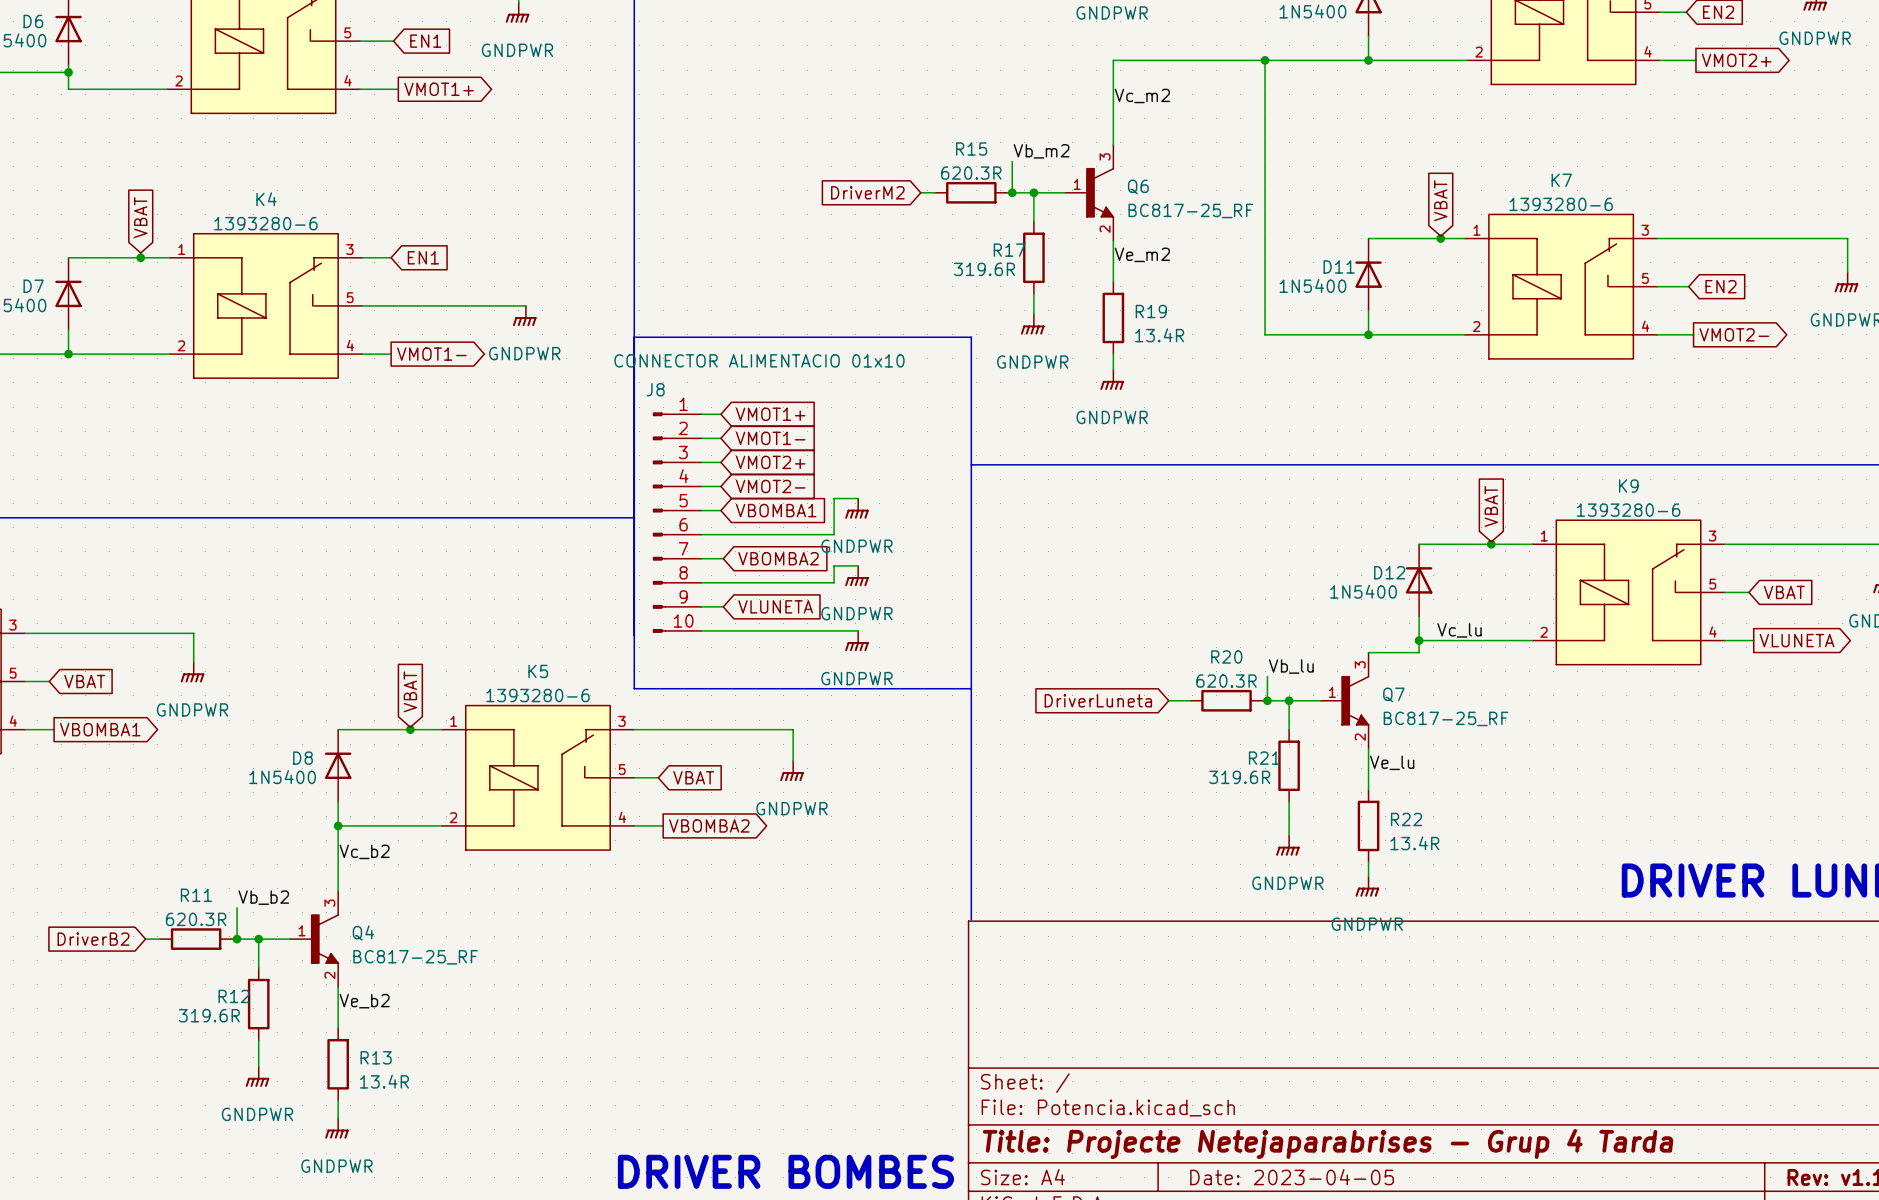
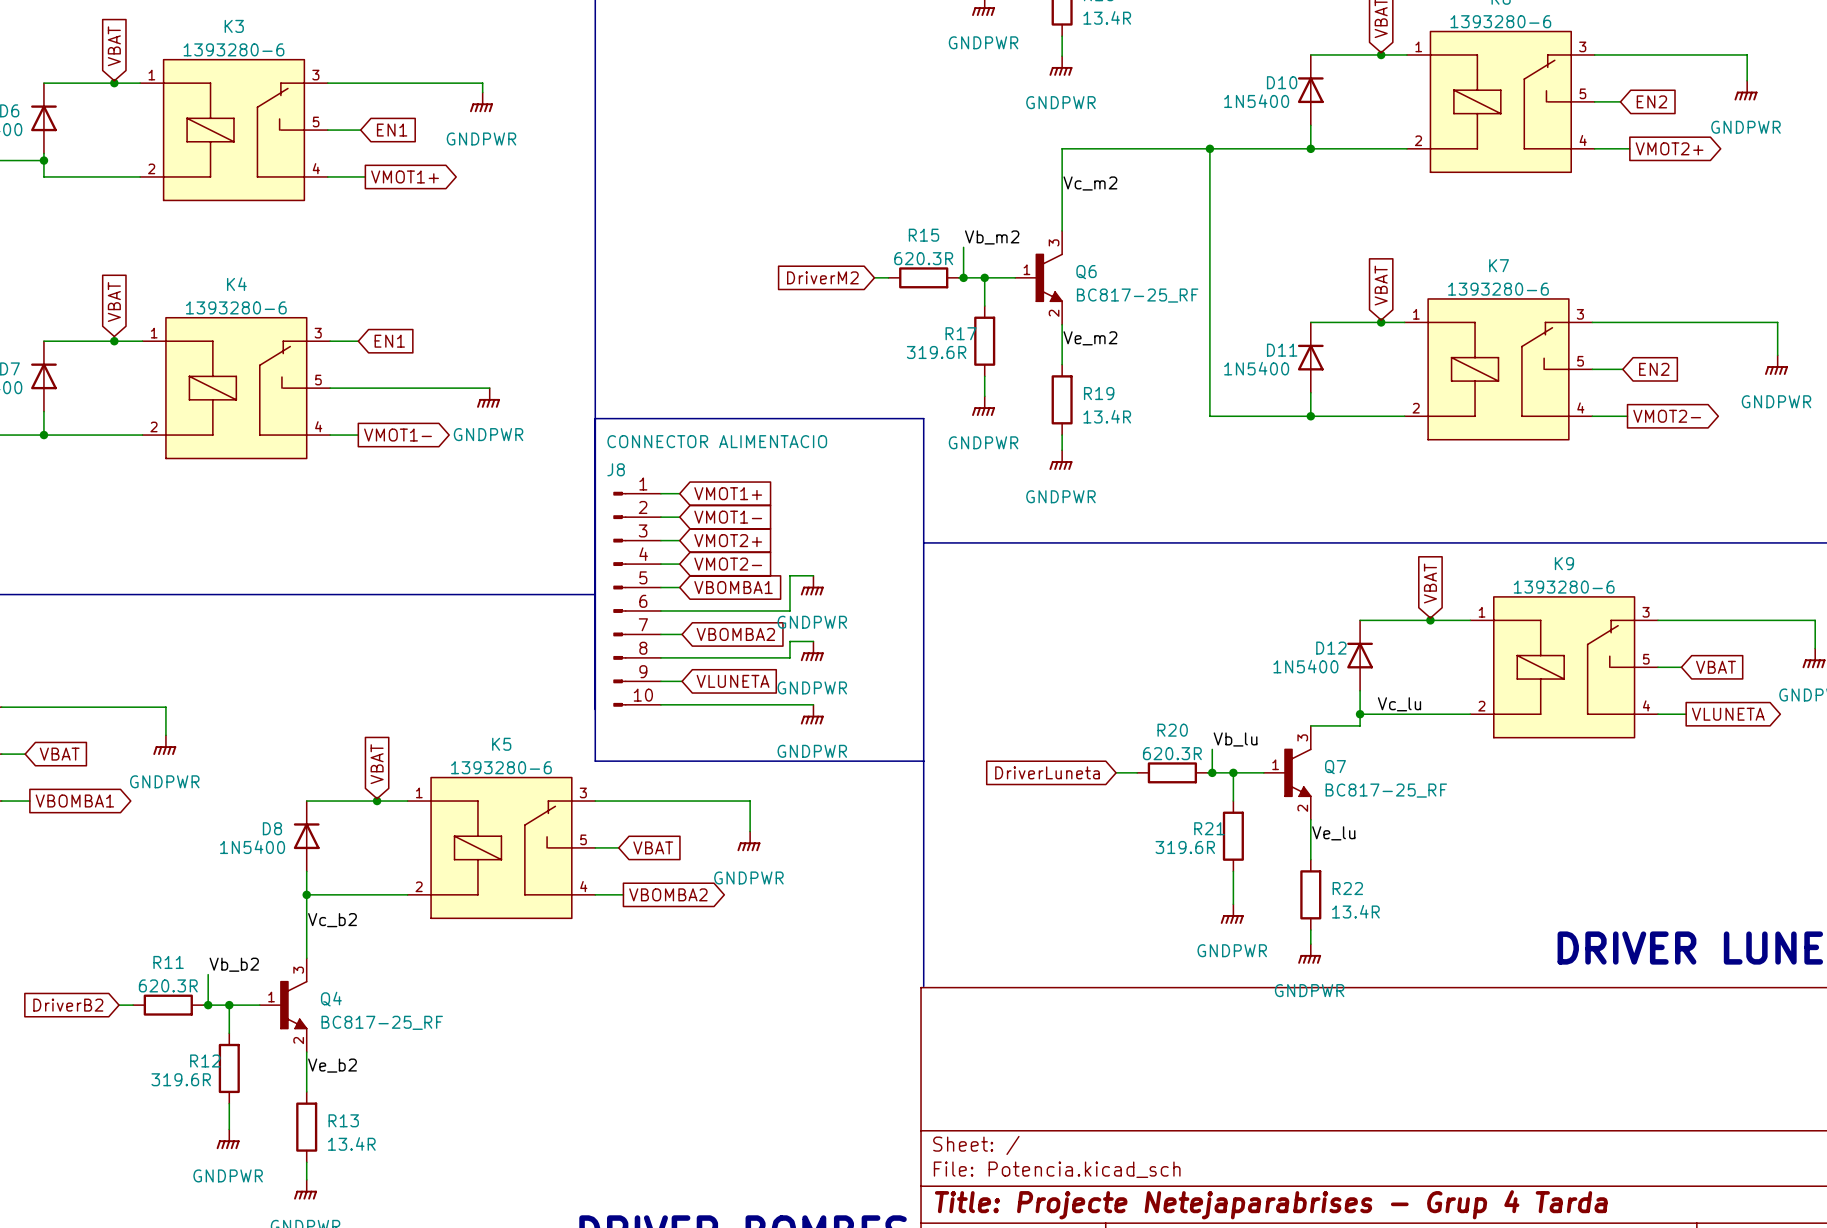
J8 value: CONNECTOR ALIMENTACIO 01x10 (759, 360) -> CONNECTOR ALIMENTACIO (717, 441)

